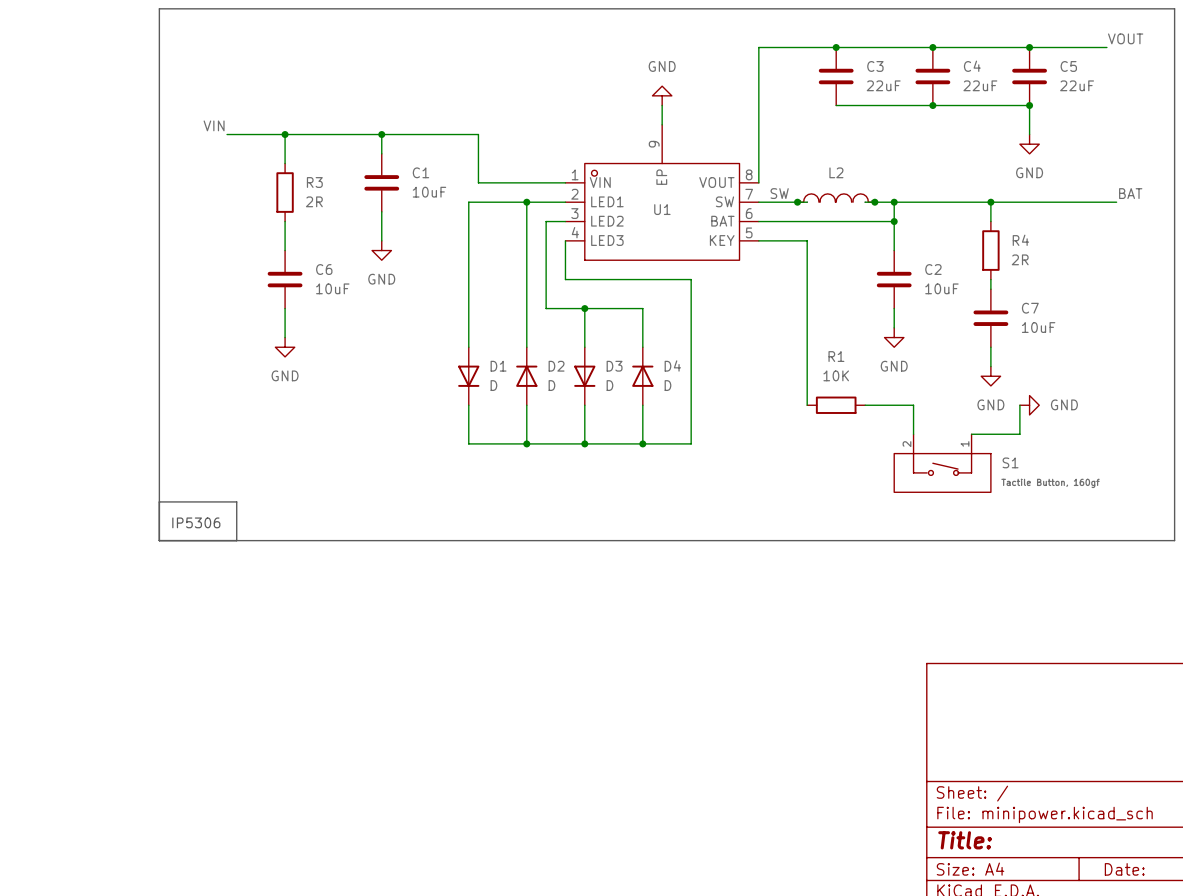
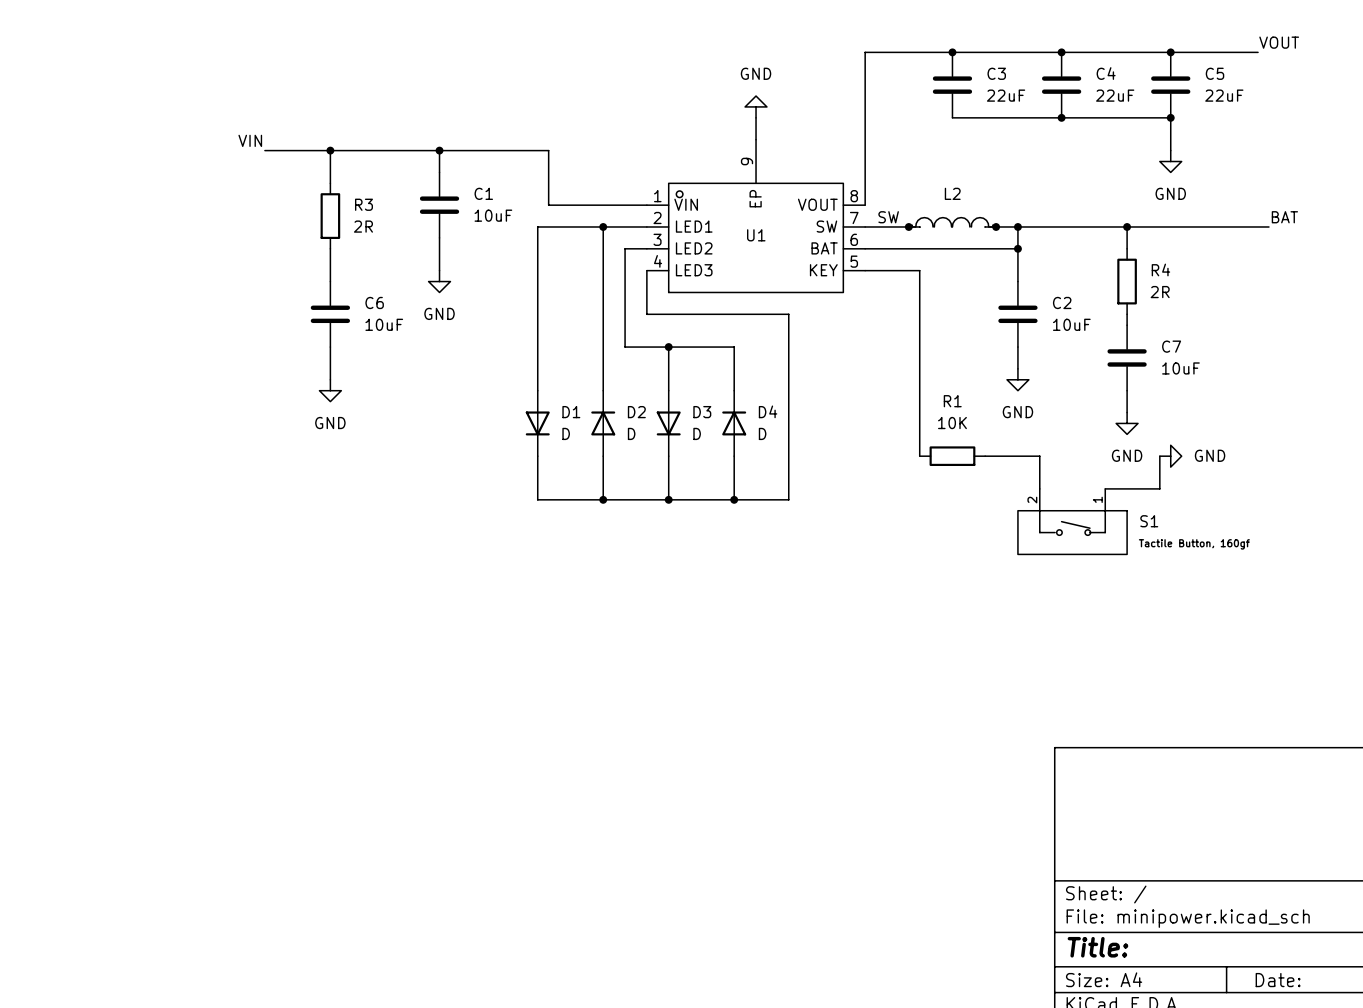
line: (159, 8) (1174, 8) (1174, 540) (159, 540) (159, 8) -> none
line: (159, 501) (236, 501) (236, 540) -> none
text: IP5306 (196, 522) -> none

